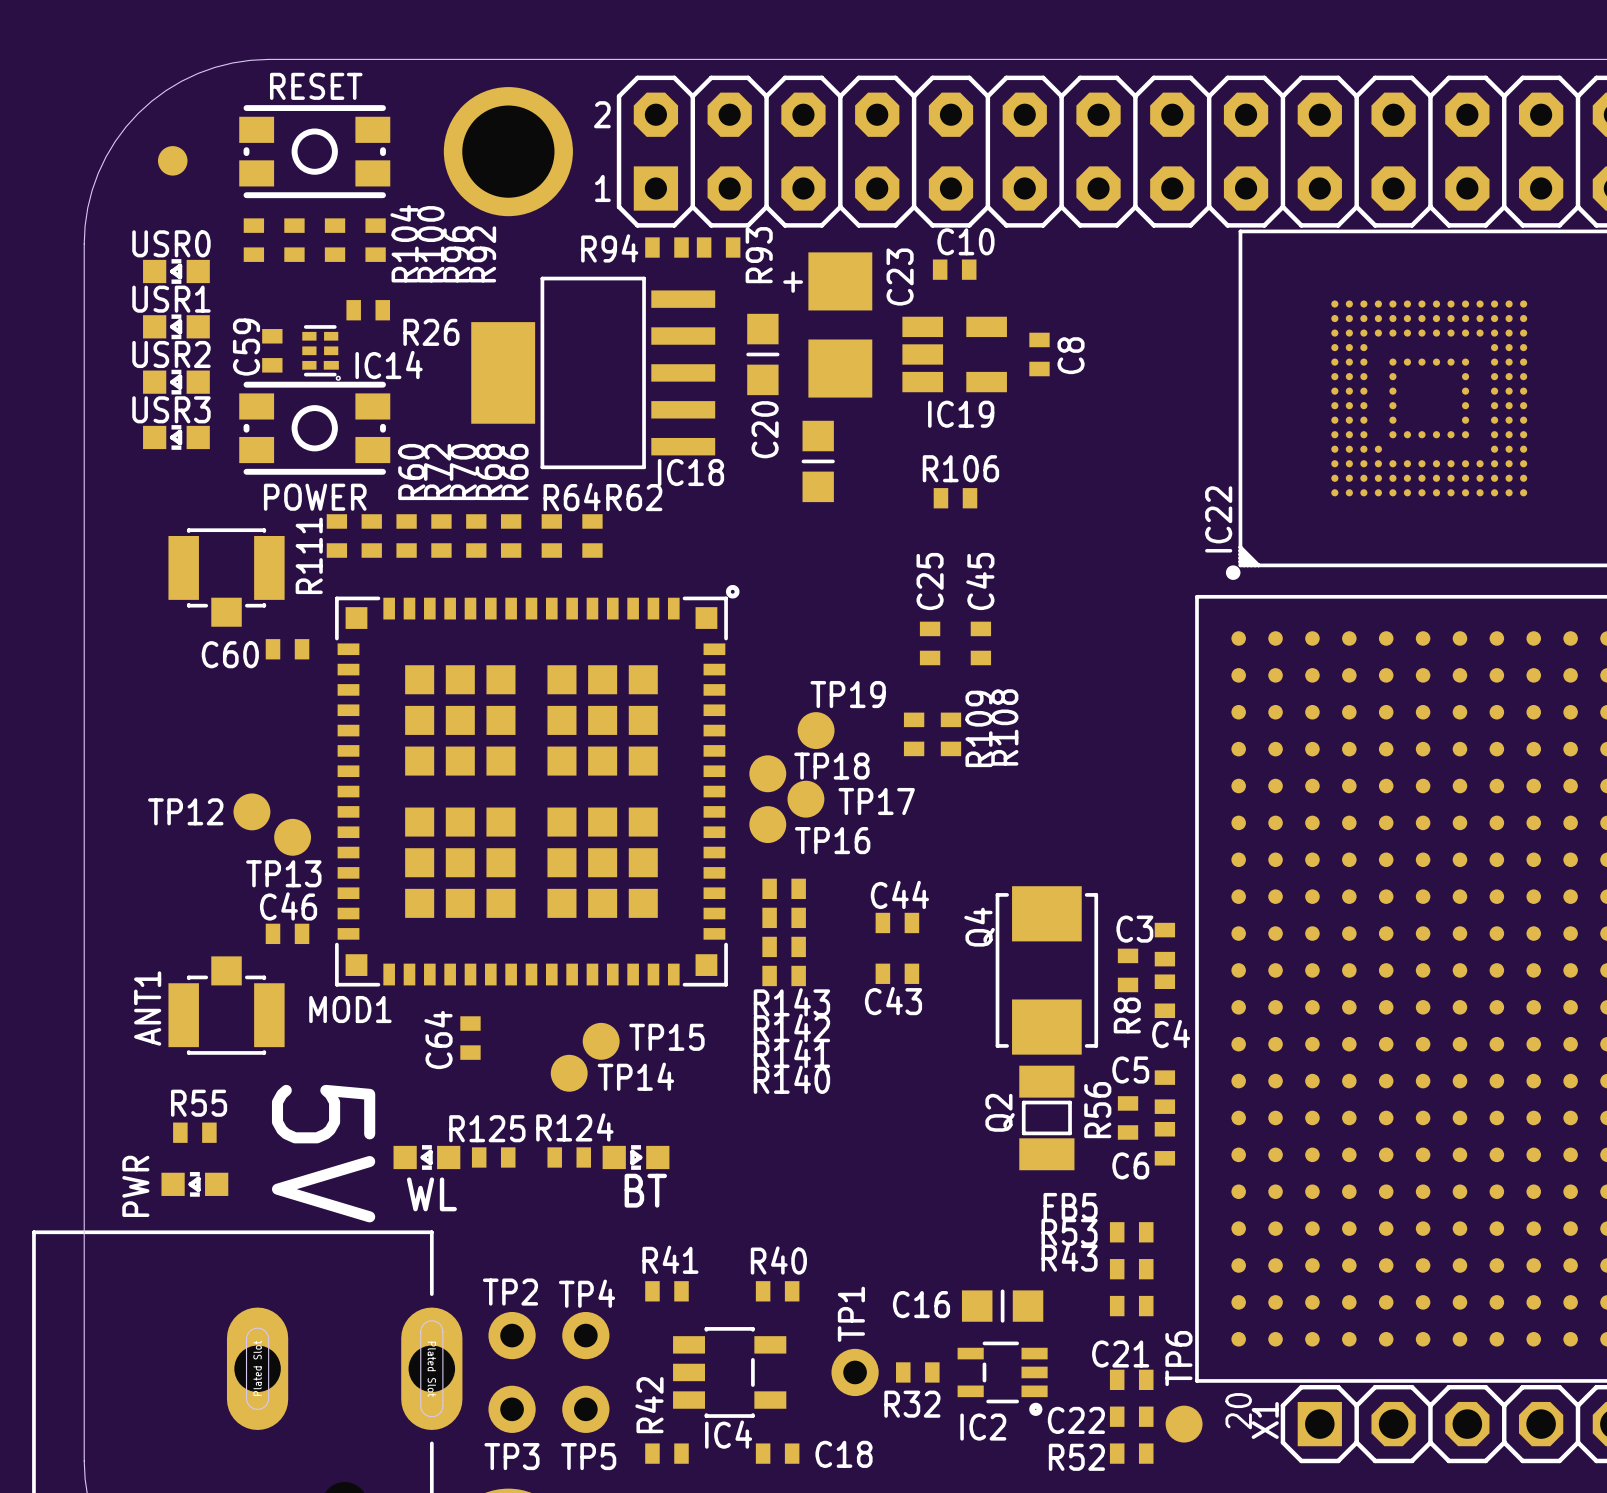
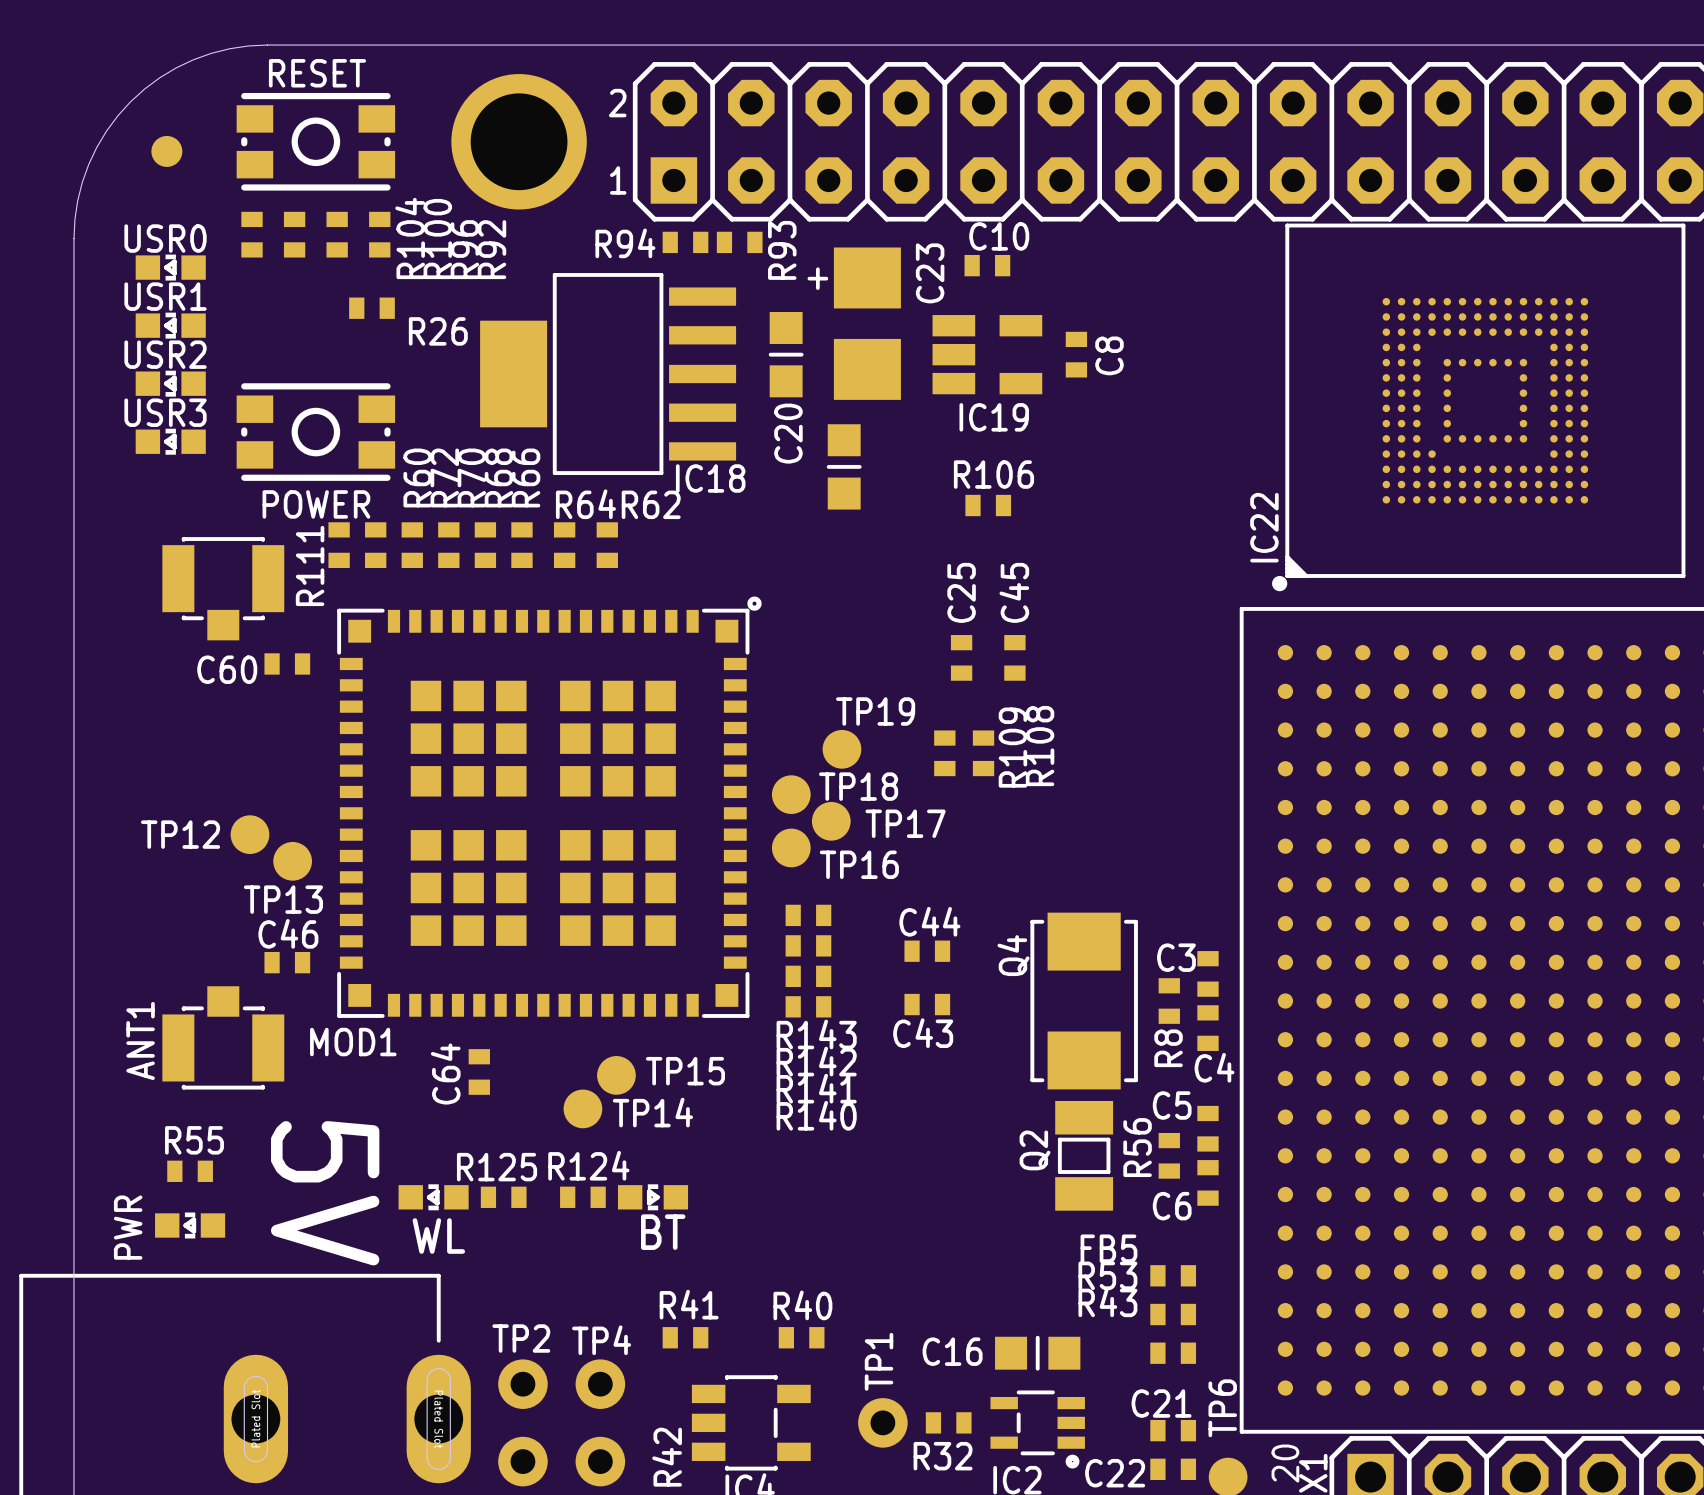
C59: (272, 350) -> none
IC14: (321, 352) -> none

